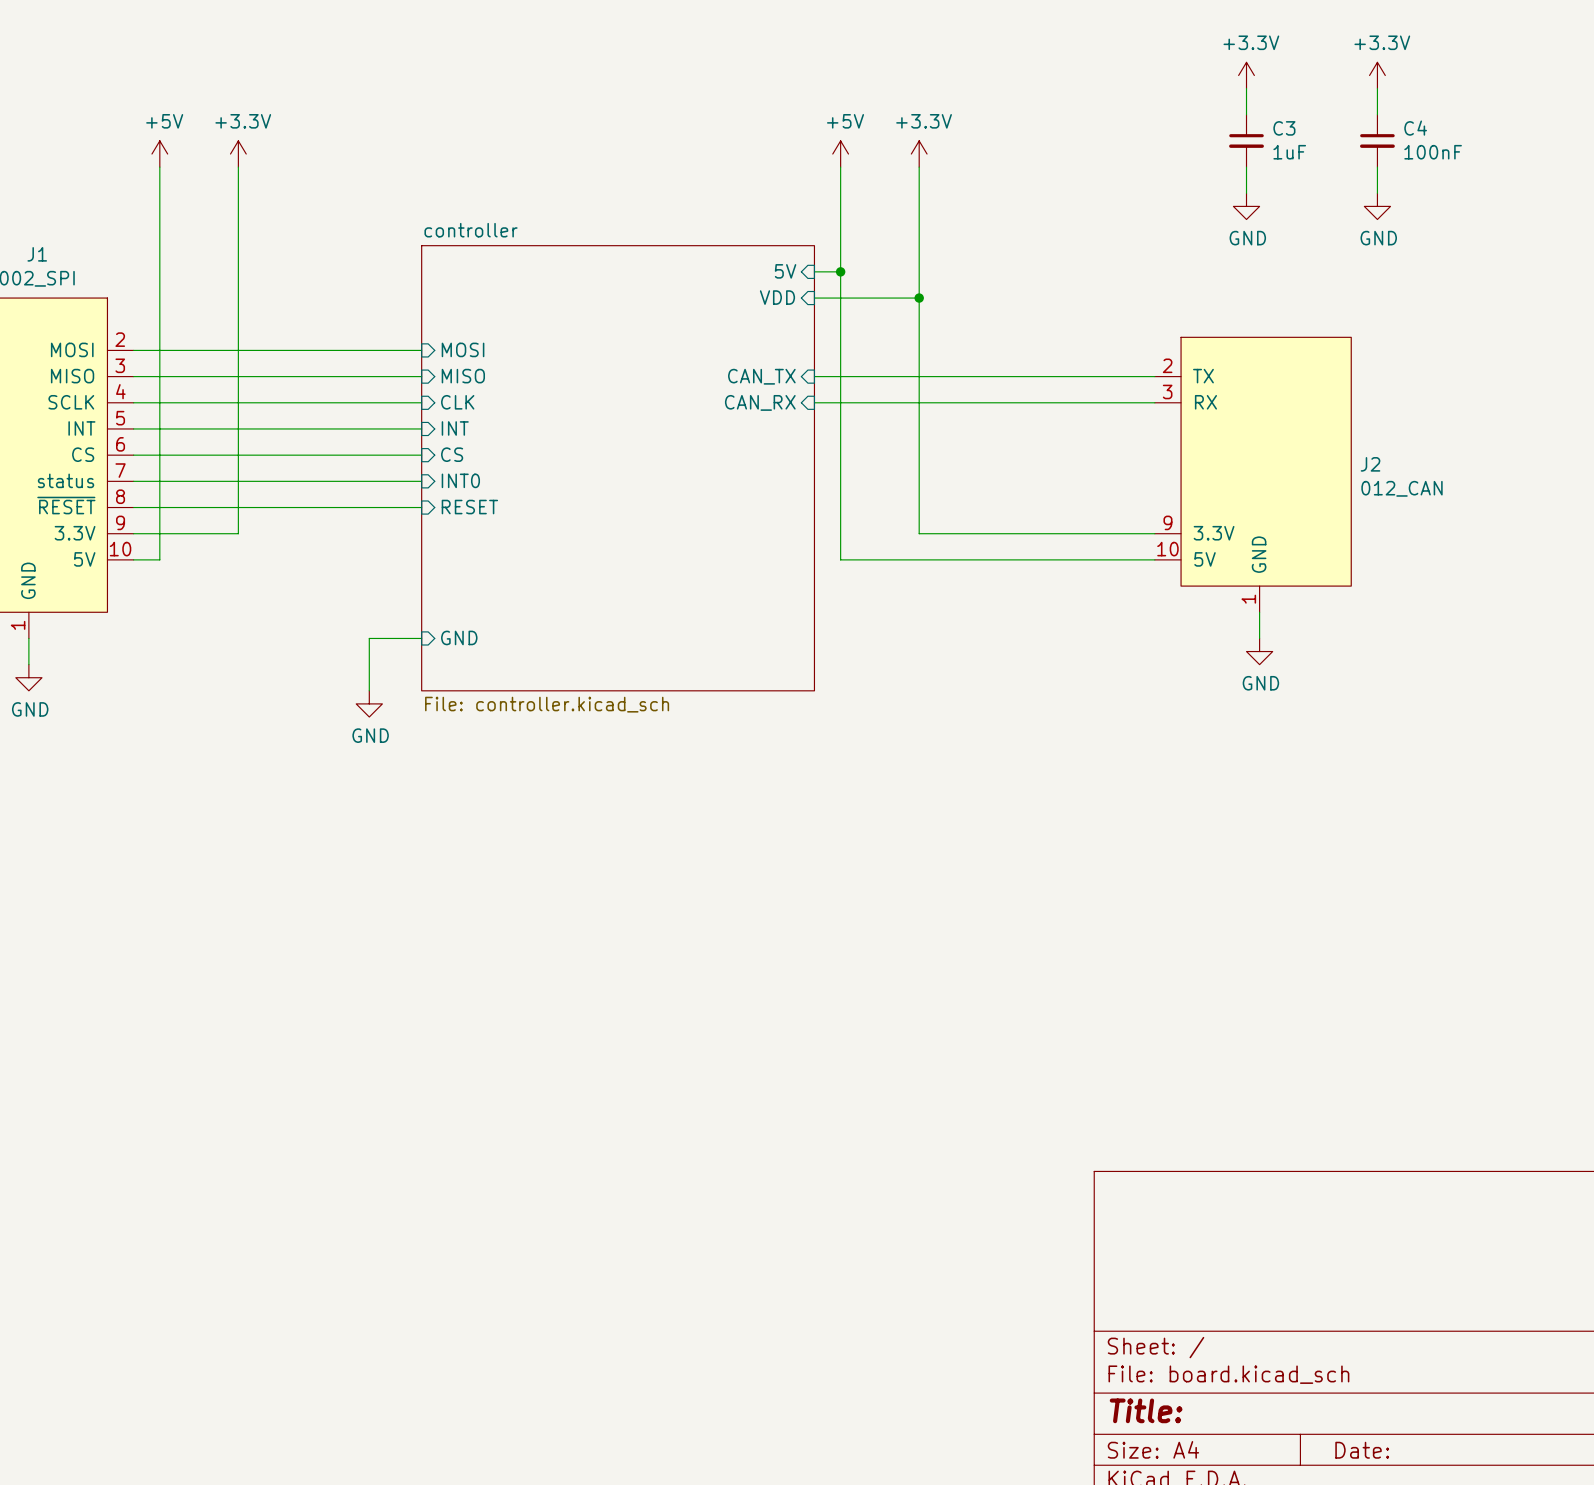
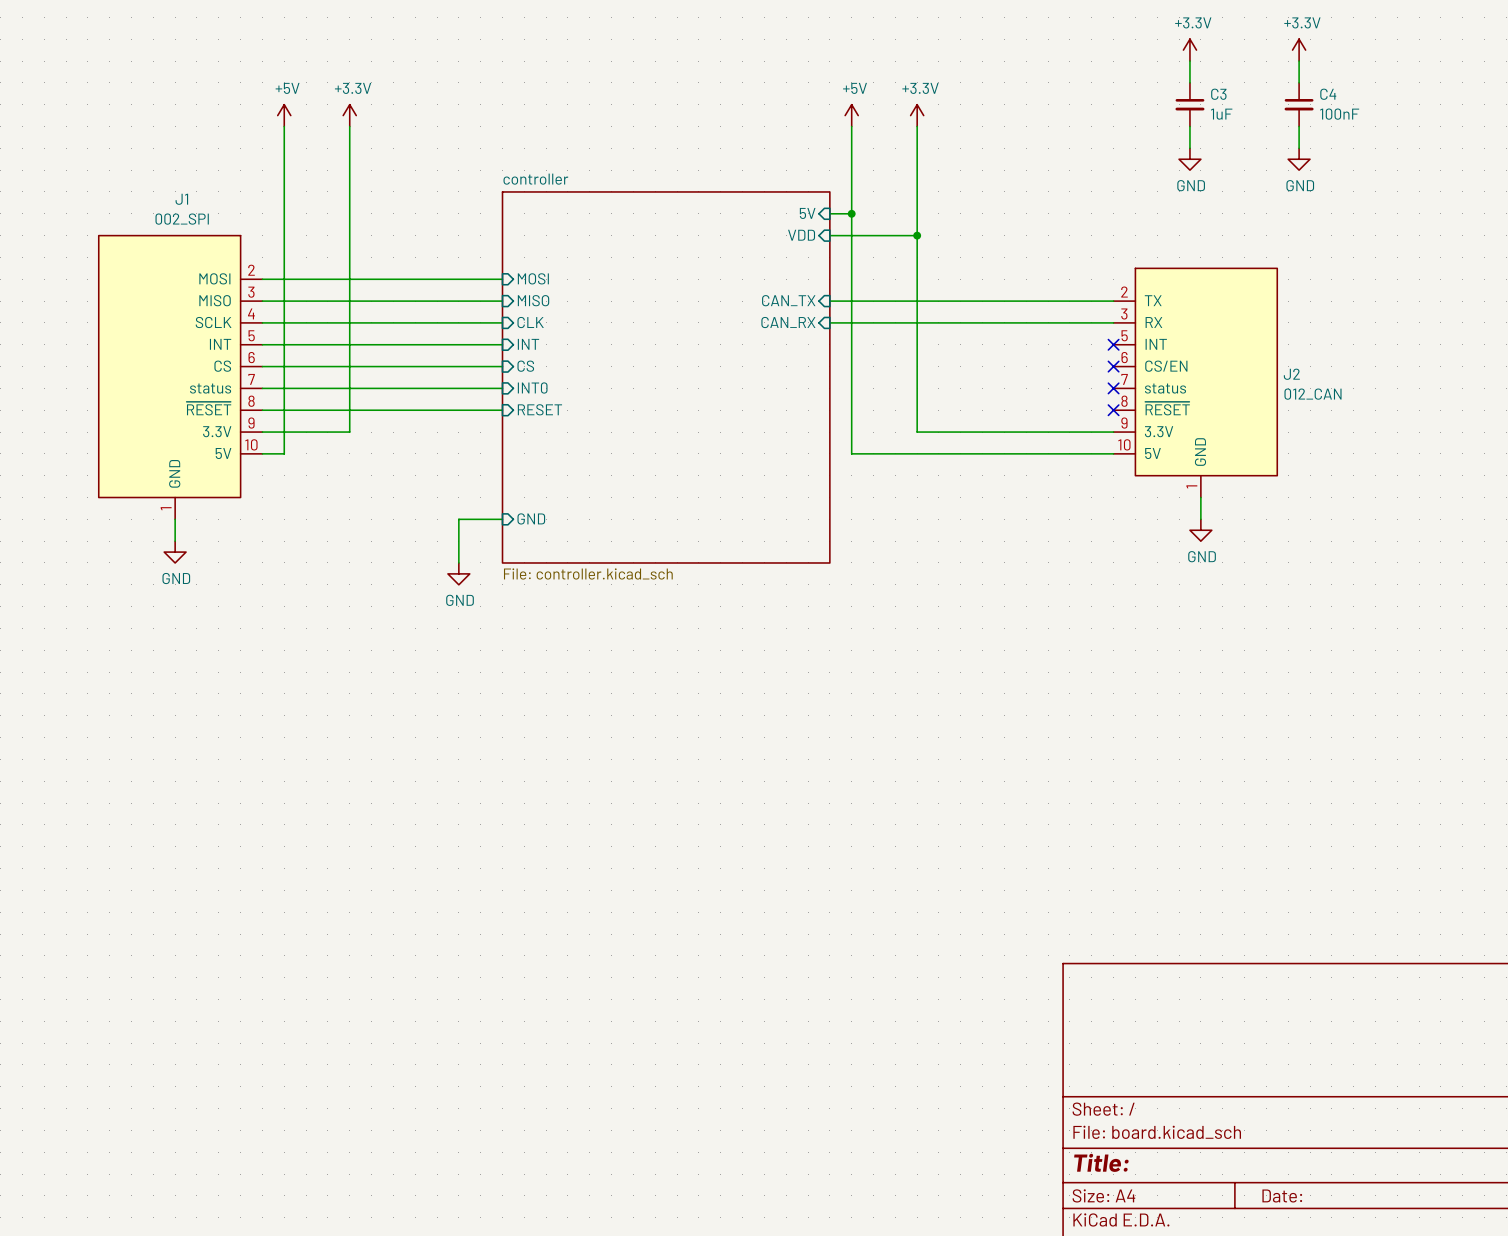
J2 symbol: [1154, 337, 1352, 613] -> [1113, 268, 1278, 498]
no-connect mark: none -> (1113, 344)
no-connect mark: none -> (1113, 366)
no-connect mark: none -> (1113, 388)
no-connect mark: none -> (1113, 410)

